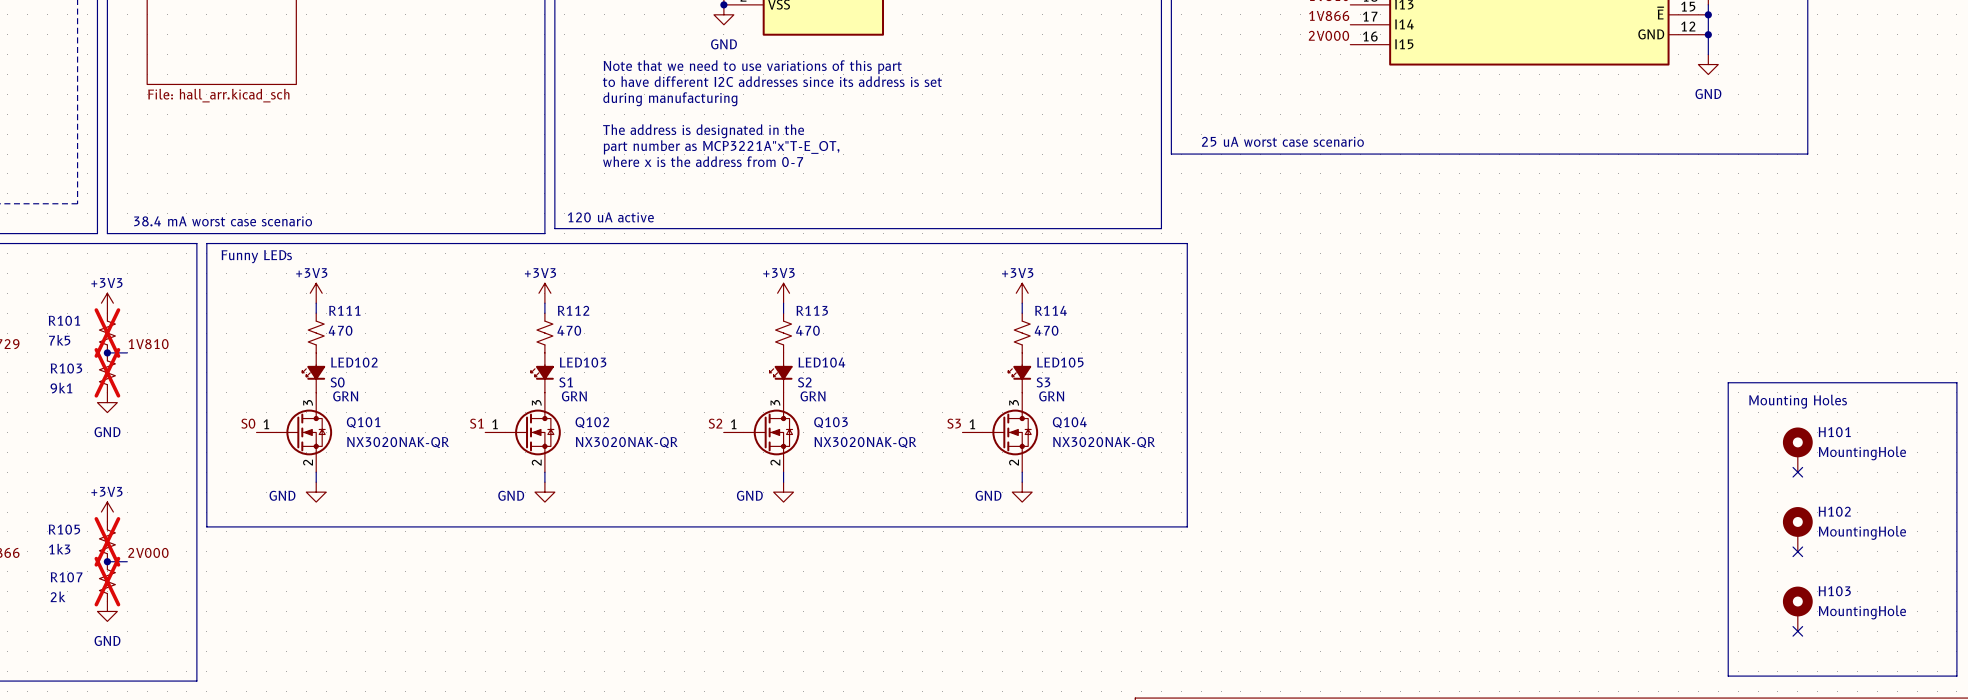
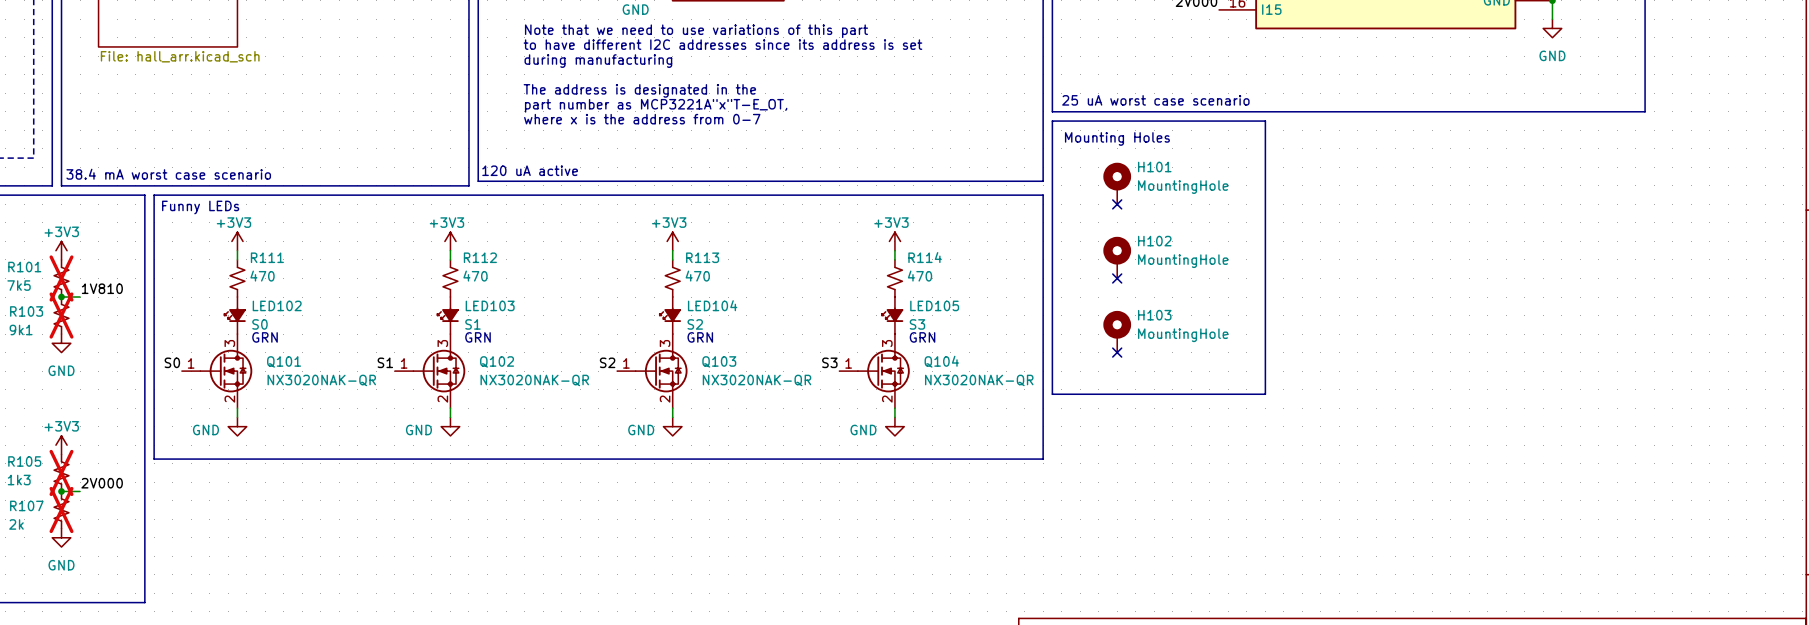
line: none -> (1052, 121) (1265, 121) (1265, 394) (1052, 394) (1052, 121)
text: none -> Mounting Holes (1117, 138)
line: (1161, 243) (1187, 243) (1187, 526) (1161, 526) -> (1043, 195) (1043, 459)
no-connect mark: none -> (1117, 204)
power symbol position: +3V3 (316, 293) -> +3V3 (237, 241)
power symbol position: +3V3 (544, 293) -> +3V3 (450, 241)
power symbol position: +3V3 (783, 293) -> +3V3 (672, 241)
power symbol position: +3V3 (1022, 293) -> +3V3 (894, 241)
wire: (316, 303) (316, 313) -> (237, 250) (237, 259)
wire: (544, 303) (544, 313) -> (450, 250) (450, 259)
wire: (783, 303) (783, 313) -> (672, 250) (672, 259)
wire: (1022, 303) (1022, 313) -> (894, 250) (894, 259)
R111 position: (316, 333) -> (237, 278)
R112 position: (544, 333) -> (450, 278)
R113 position: (783, 333) -> (672, 278)
R114 position: (1022, 333) -> (894, 278)
no-connect mark: none -> (1117, 278)
LED102 position: (313, 372) -> (235, 315)
LED103 position: (542, 372) -> (448, 315)
LED104 position: (781, 372) -> (670, 315)
LED105 position: (1019, 372) -> (892, 315)
line: (1728, 382) (1956, 382) (1956, 676) (1728, 676) (1728, 382) -> none
text position: GRN (345, 396) -> GRN (265, 337)
text position: GRN (574, 396) -> GRN (478, 337)
text position: GRN (813, 396) -> GRN (700, 337)
text position: GRN (1051, 396) -> GRN (922, 337)
text: Mounting Holes (1798, 401) -> none
no-connect mark: none -> (1117, 352)
label position: S0 (248, 423) -> S0 (172, 362)
label position: S1 (476, 423) -> S1 (385, 362)
label position: S2 (715, 423) -> S2 (607, 362)
label position: S3 (954, 423) -> S3 (829, 362)
Q101 position: (294, 432) -> (217, 371)
Q102 position: (523, 432) -> (430, 371)
Q103 position: (761, 432) -> (652, 371)
Q104 position: (1000, 432) -> (874, 371)
H101 position: (1797, 449) -> (1117, 183)
wire: (316, 472) (316, 482) -> (237, 408) (237, 417)
wire: (544, 472) (544, 482) -> (450, 408) (450, 417)
wire: (783, 472) (783, 482) -> (672, 408) (672, 417)
wire: (1022, 472) (1022, 482) -> (894, 408) (894, 417)
no-connect mark: (1797, 472) -> none
power symbol position: GND (316, 492) -> GND (237, 426)
power symbol position: GND (544, 492) -> GND (450, 426)
power symbol position: GND (783, 492) -> GND (672, 426)
power symbol position: GND (1022, 492) -> GND (894, 426)
H102 position: (1797, 529) -> (1117, 257)
no-connect mark: (1797, 551) -> none
H103 position: (1797, 608) -> (1117, 331)
no-connect mark: (1797, 631) -> none

